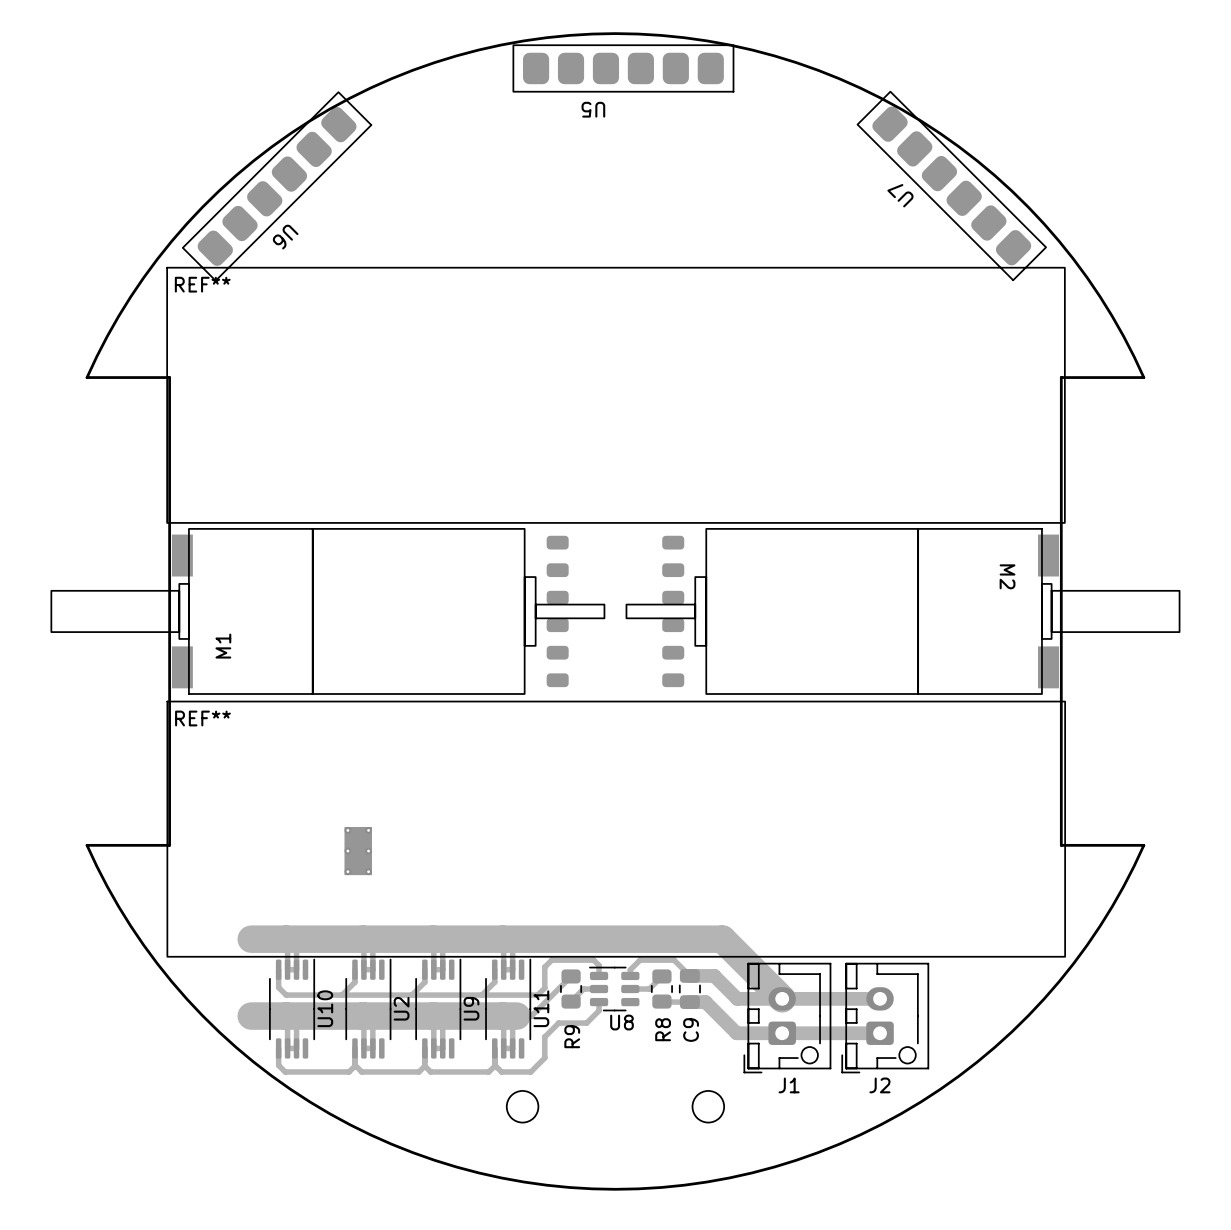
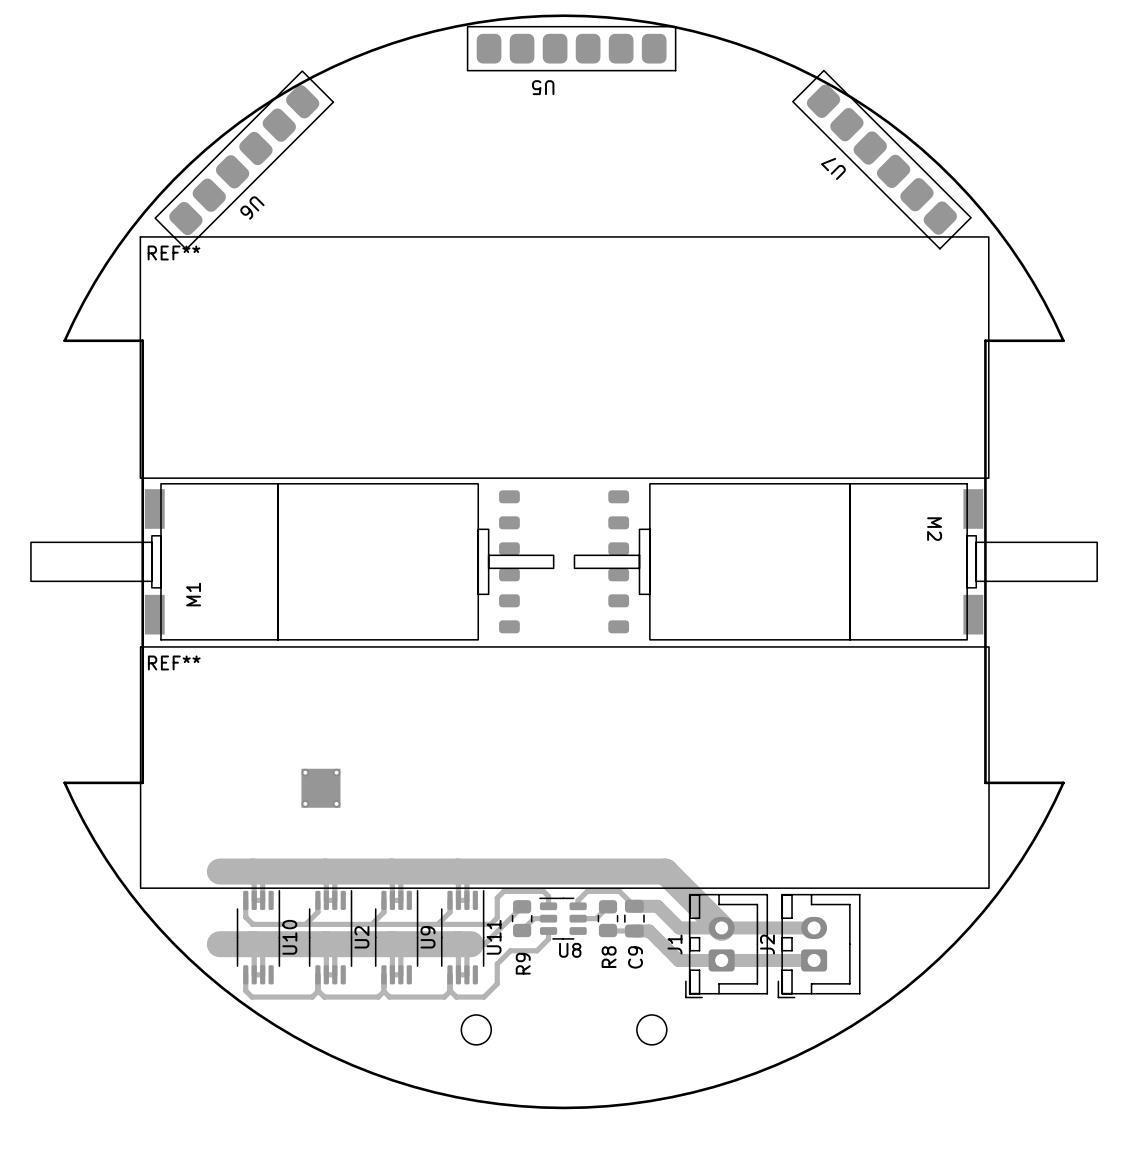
part footprint: [344, 826, 372, 876] -> [301, 768, 341, 808]
J1 footprint: [743, 962, 832, 1074] -> [685, 893, 769, 999]
J2 footprint: [841, 962, 930, 1074] -> [777, 893, 861, 999]
J1 name position: J1 (789, 1085) -> J1 (675, 944)
J2 name position: J2 (879, 1085) -> J2 (767, 944)

